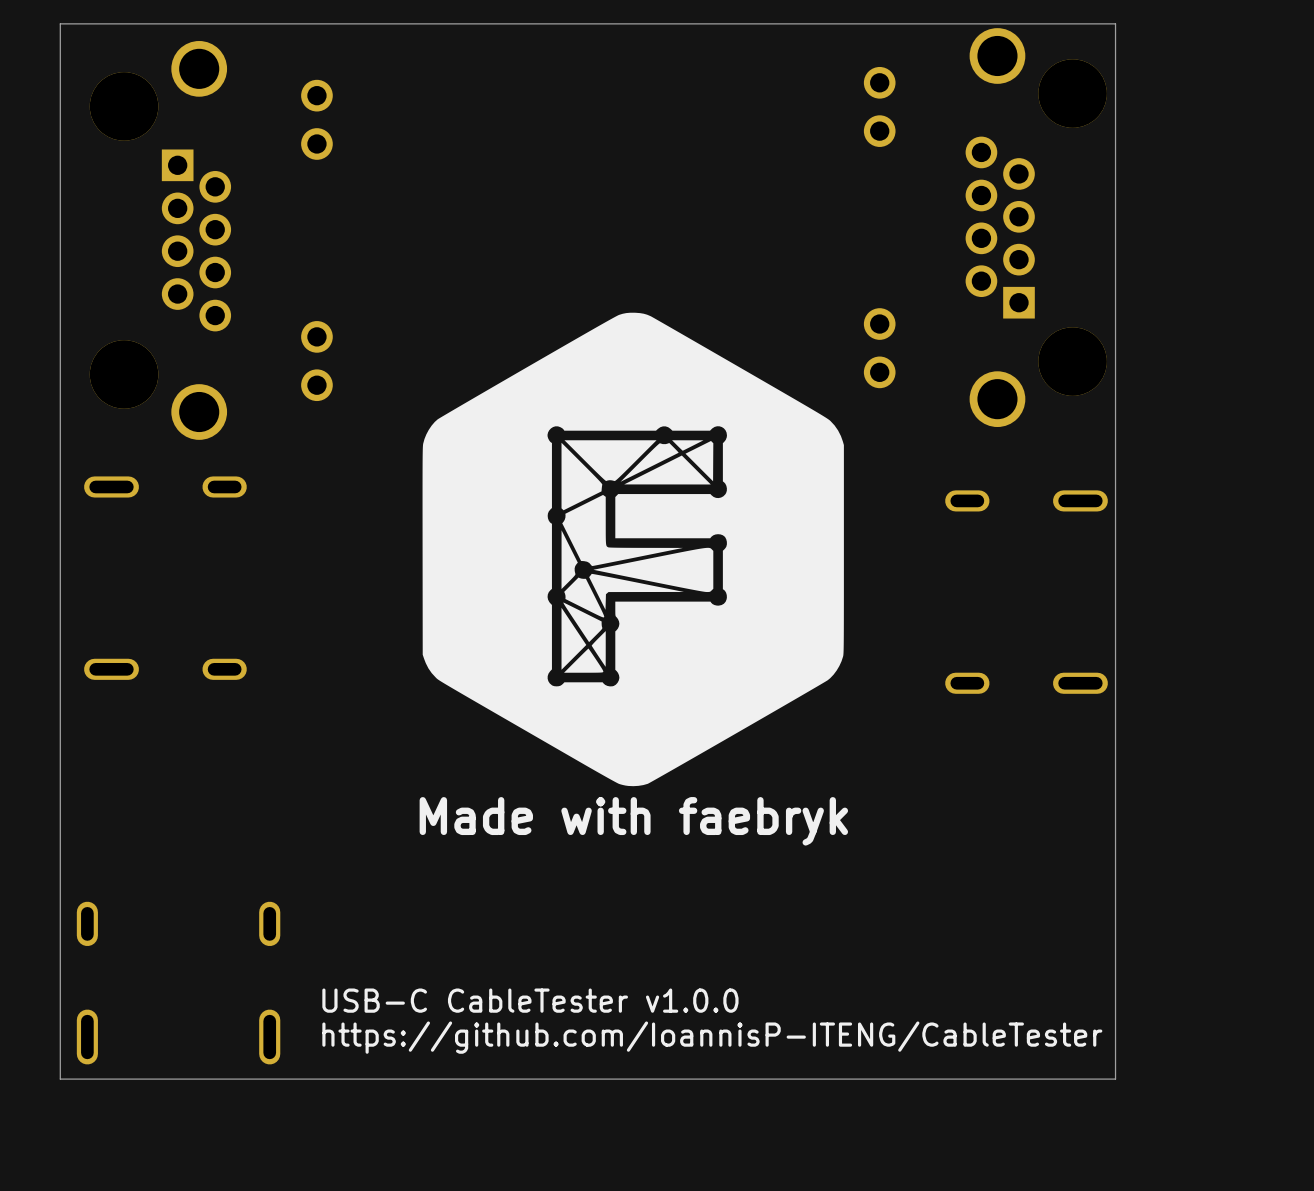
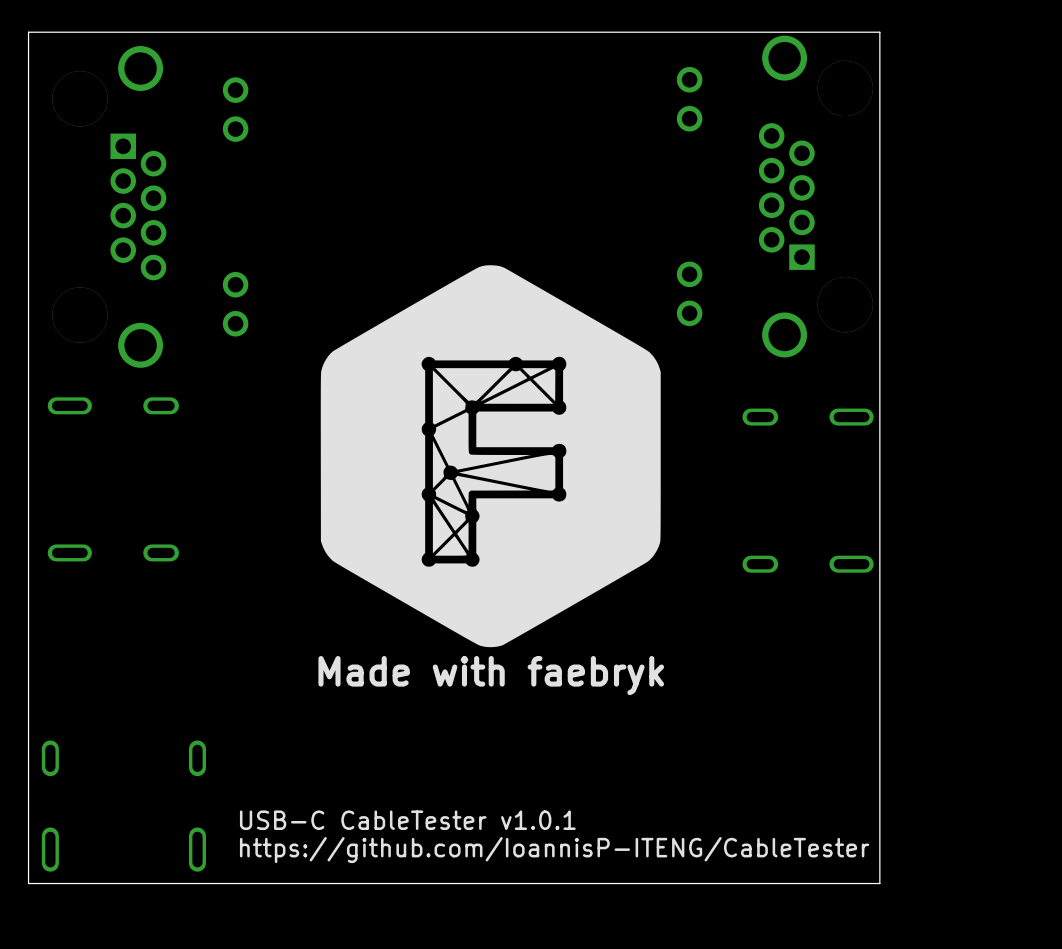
text: USB-C CableTester v1.0.0 (530, 1000) -> USB-C CableTester v1.0.1 (407, 820)

